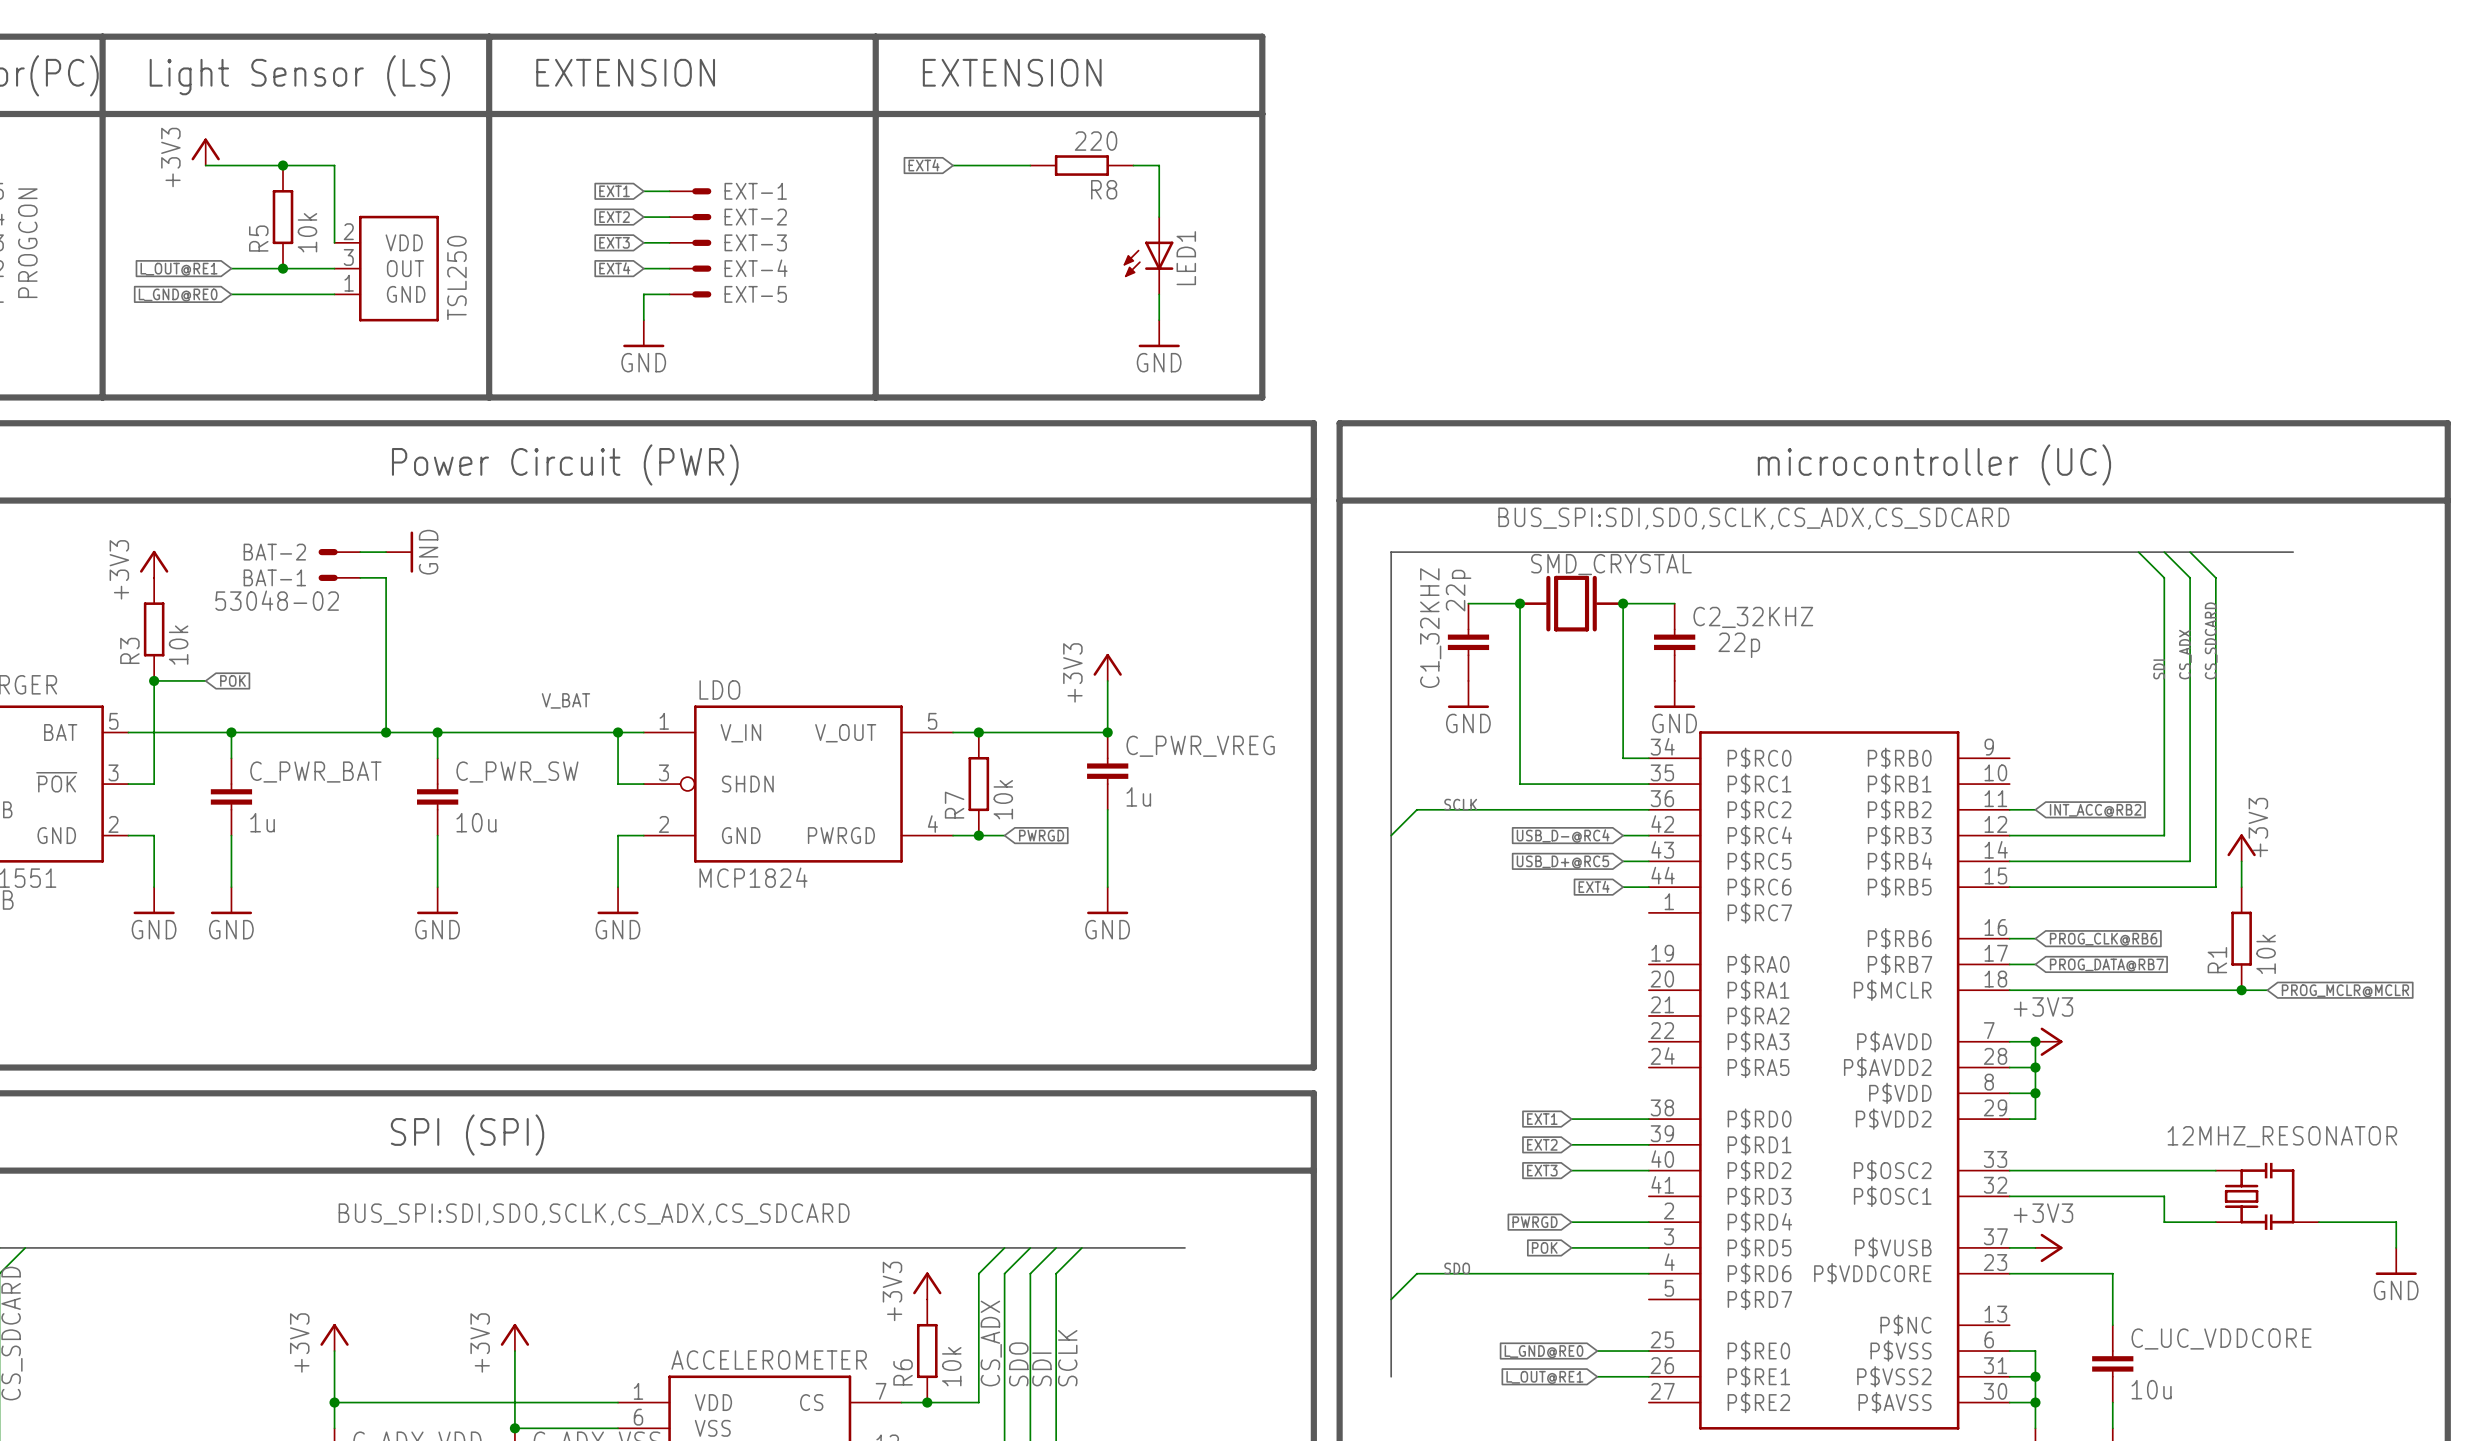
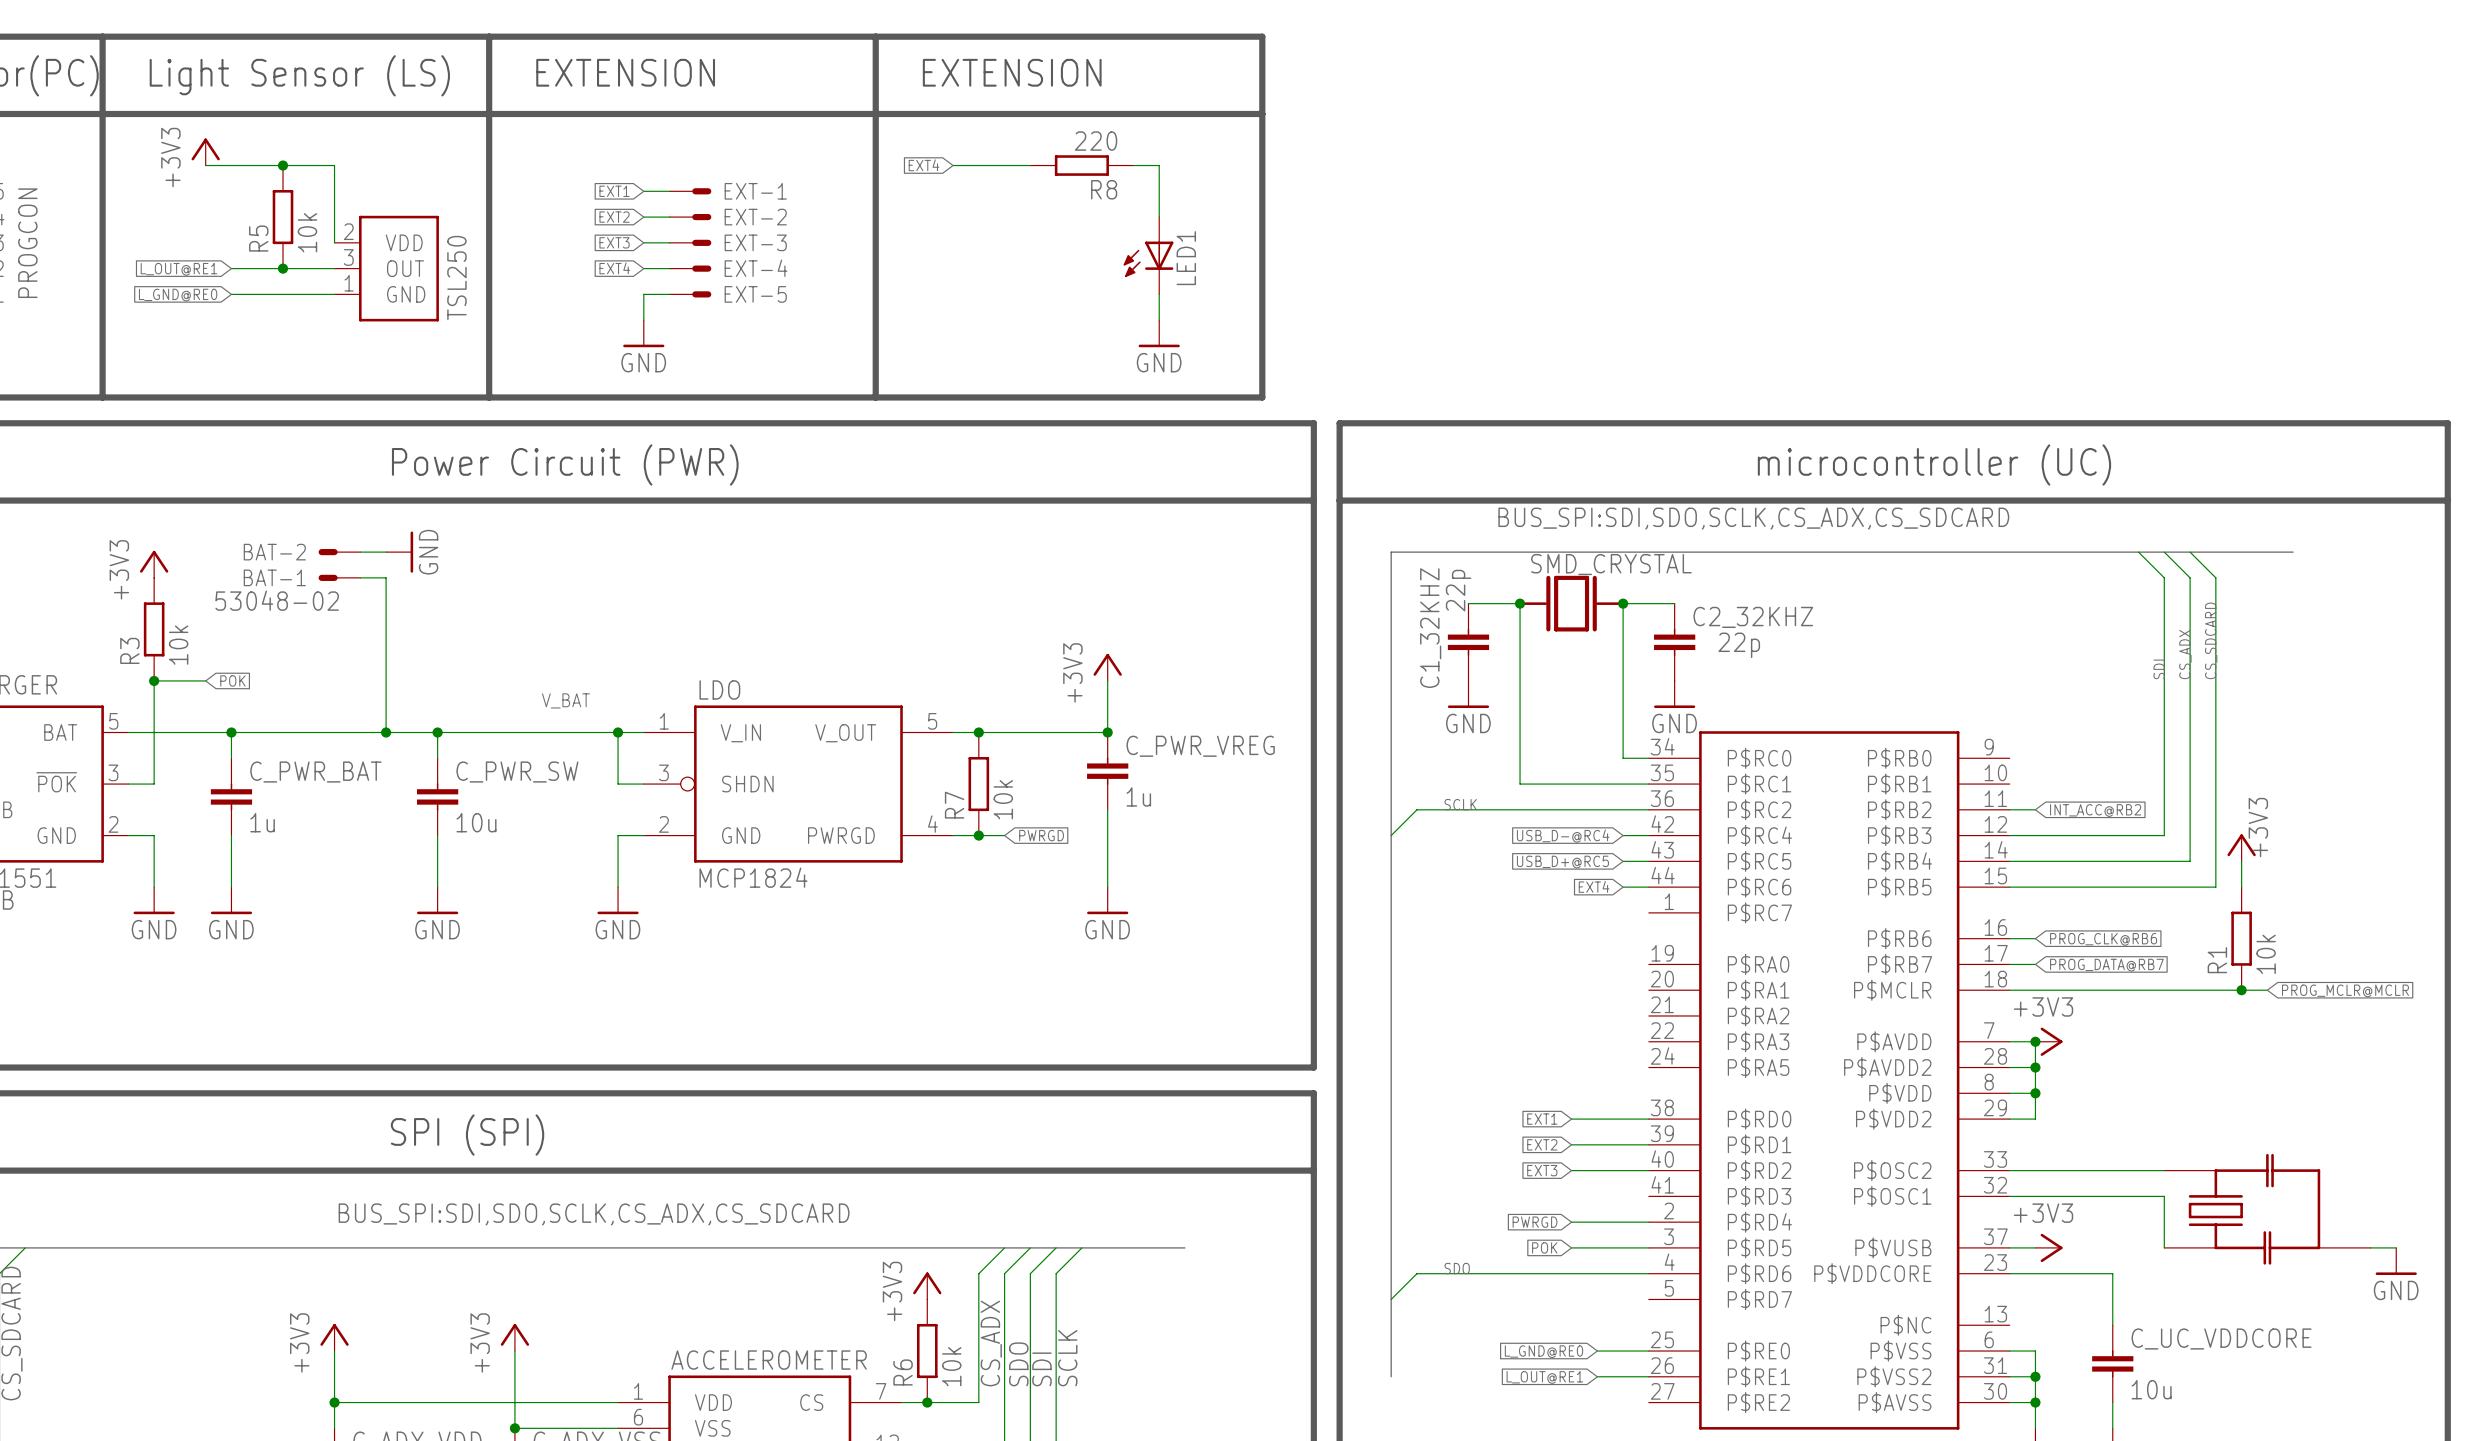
12MHZ_RESONATOR: (2267, 1196) -> none
part: none -> (2267, 1209)
wire: (2164, 1222) (2215, 1222) -> (2164, 1222) (2164, 1247)
wire: (2318, 1222) (2396, 1222) (2396, 1247) -> (2370, 1247) (2396, 1247)

